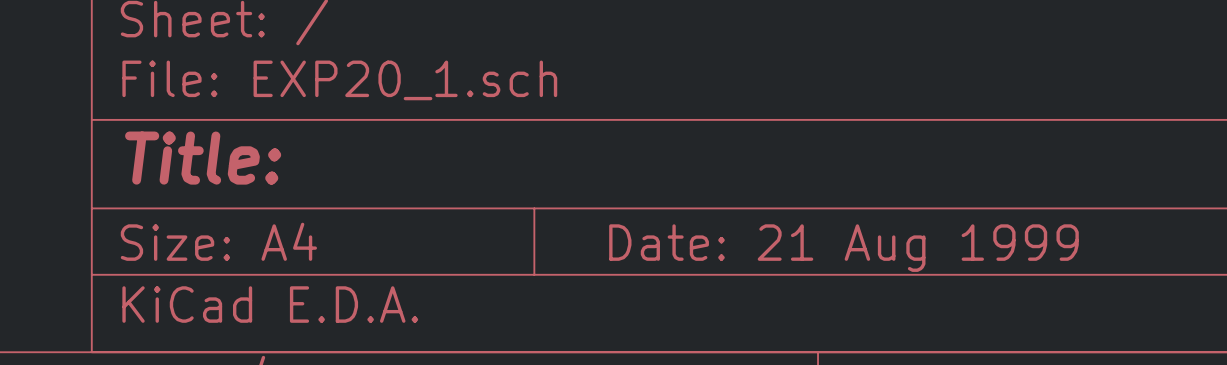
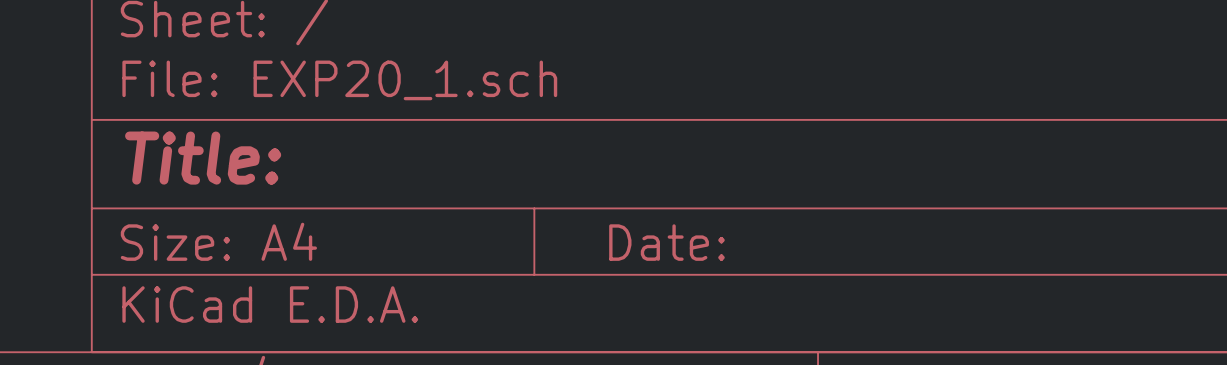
title block: Date: 21 Aug 1999 (843, 248) -> Date: (666, 242)

